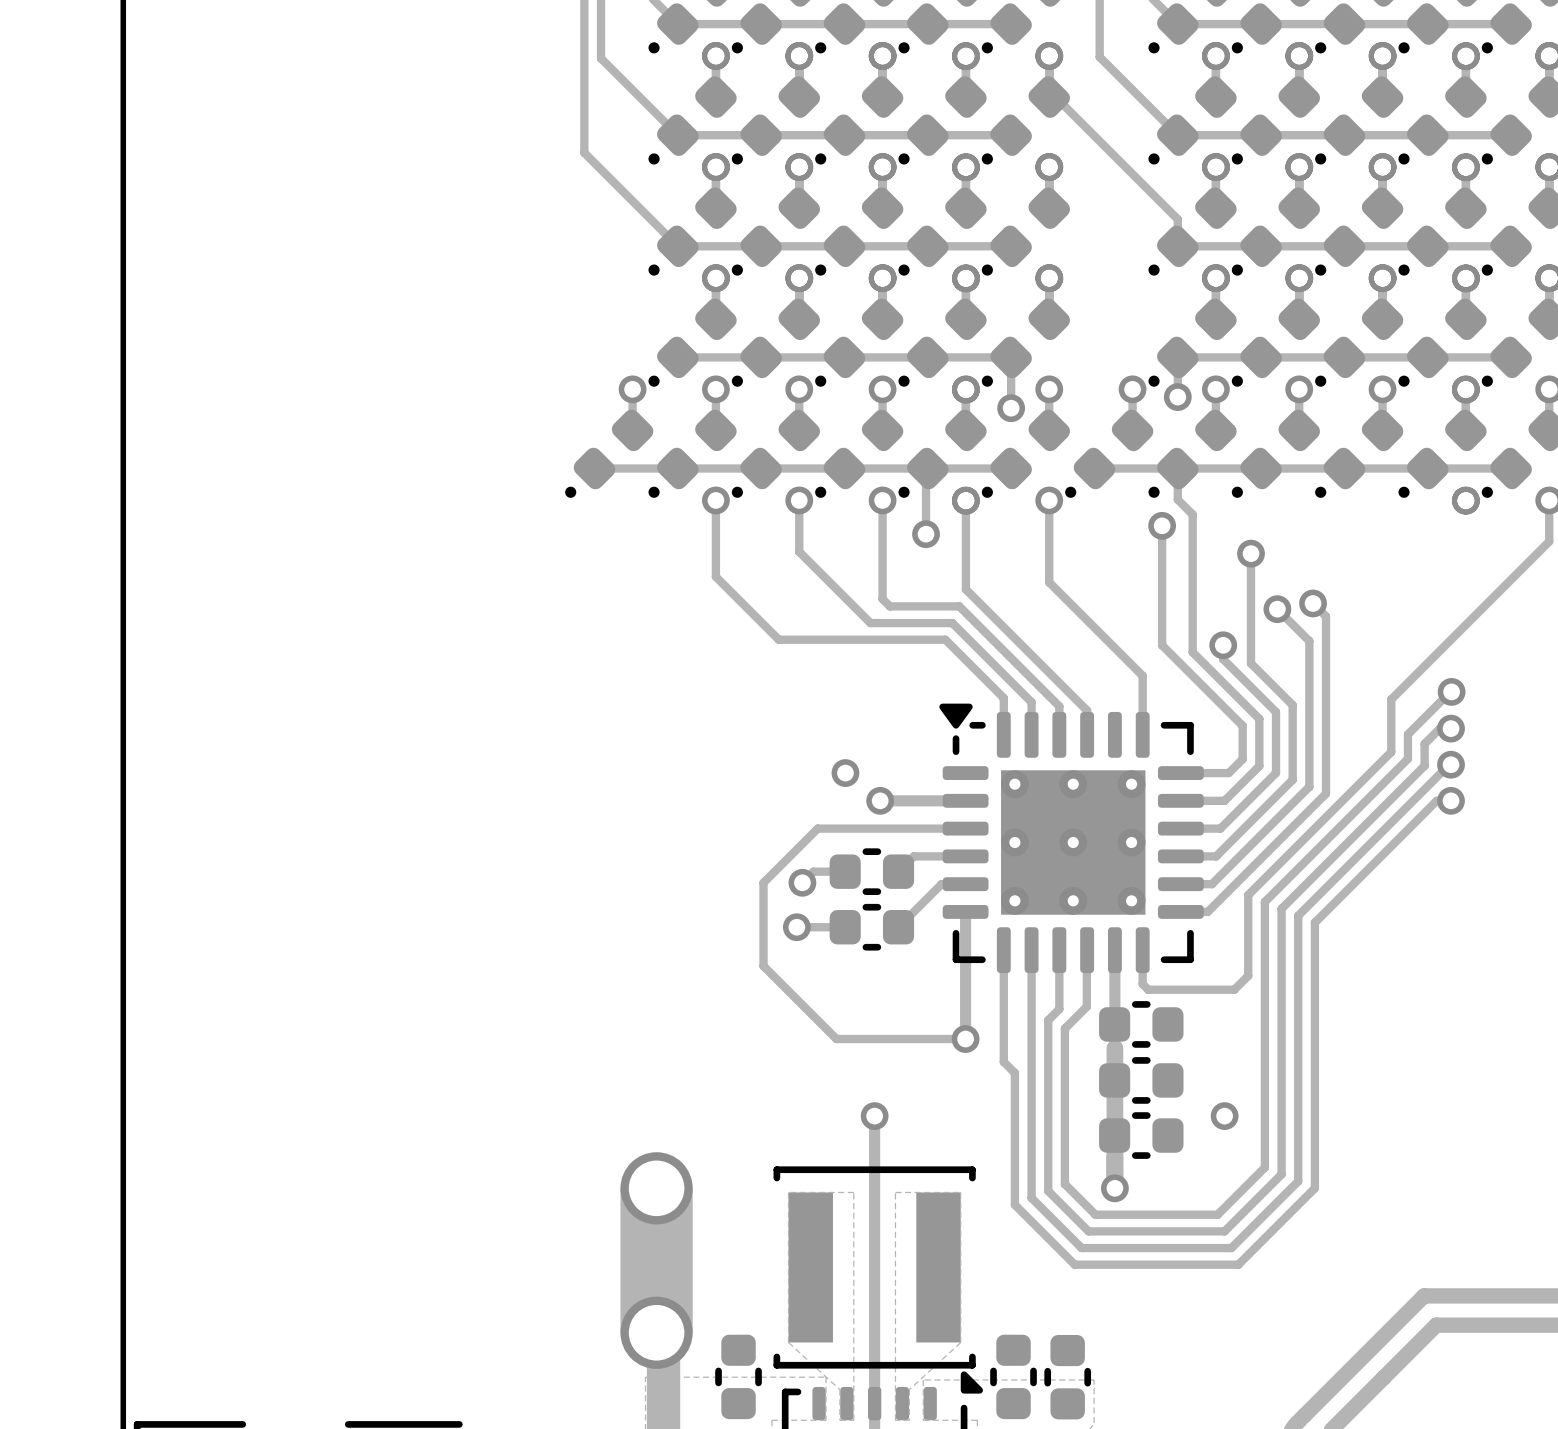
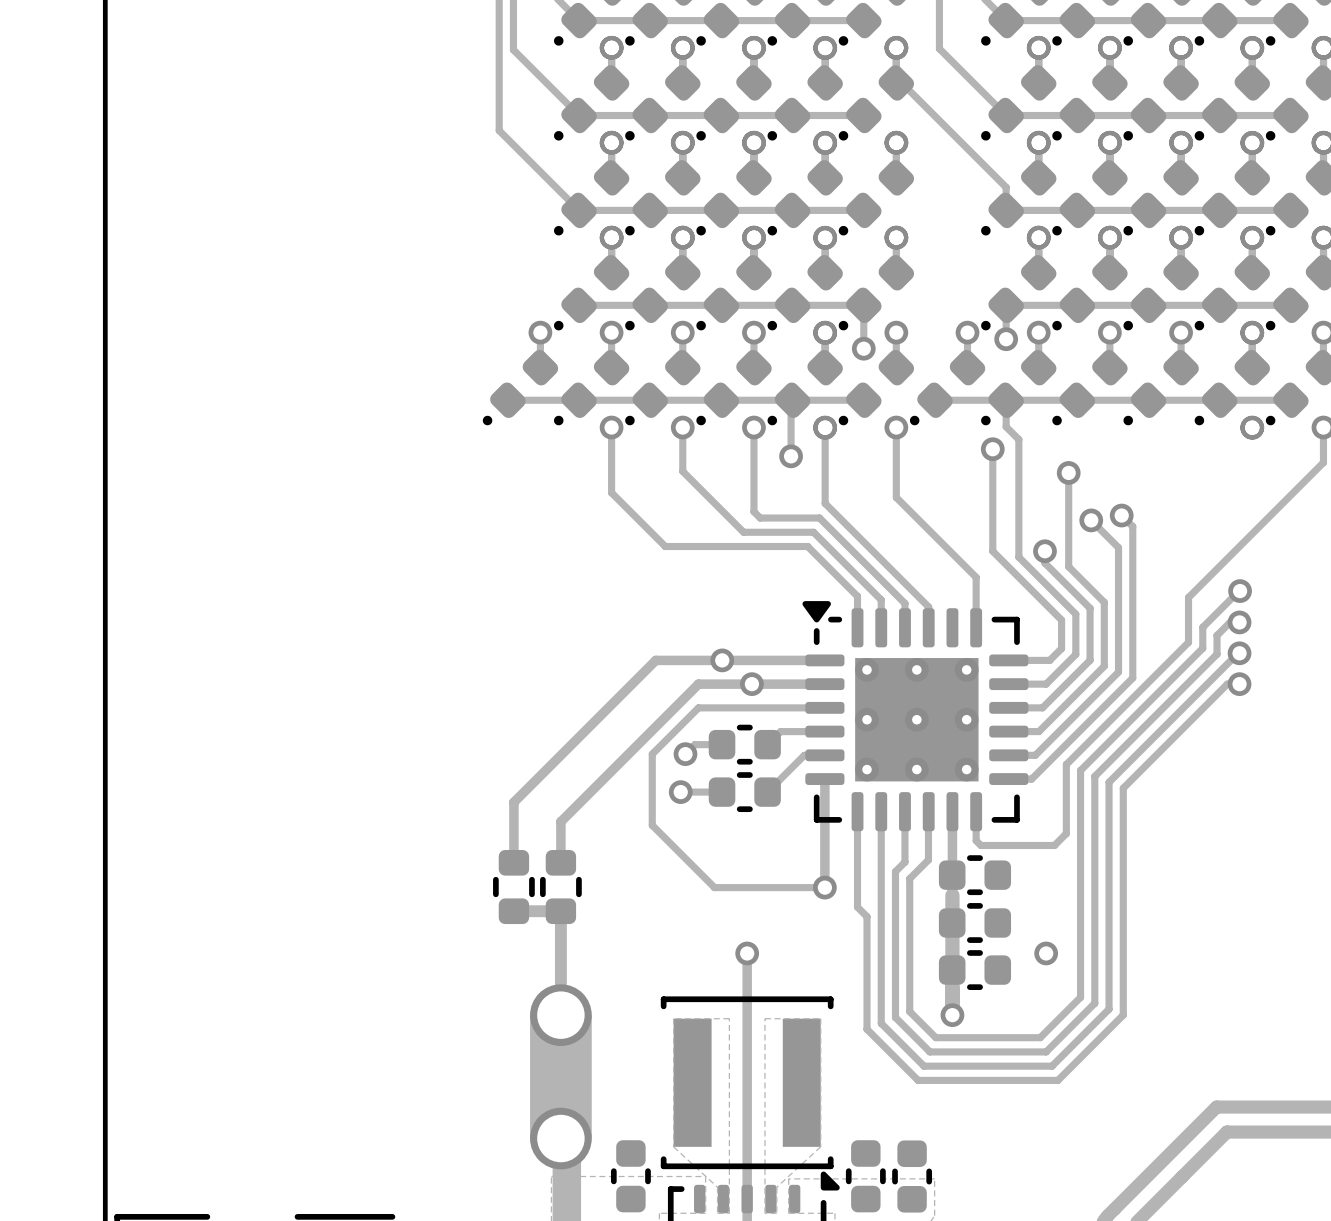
track: none -> (824, 660) (655, 660) (513, 802) (513, 862)
track: none -> (756, 684) (698, 684) (560, 821) (560, 862)
part: none -> (513, 887)
part: none -> (560, 887)
track: none -> (513, 911) (560, 911) (560, 1015)

